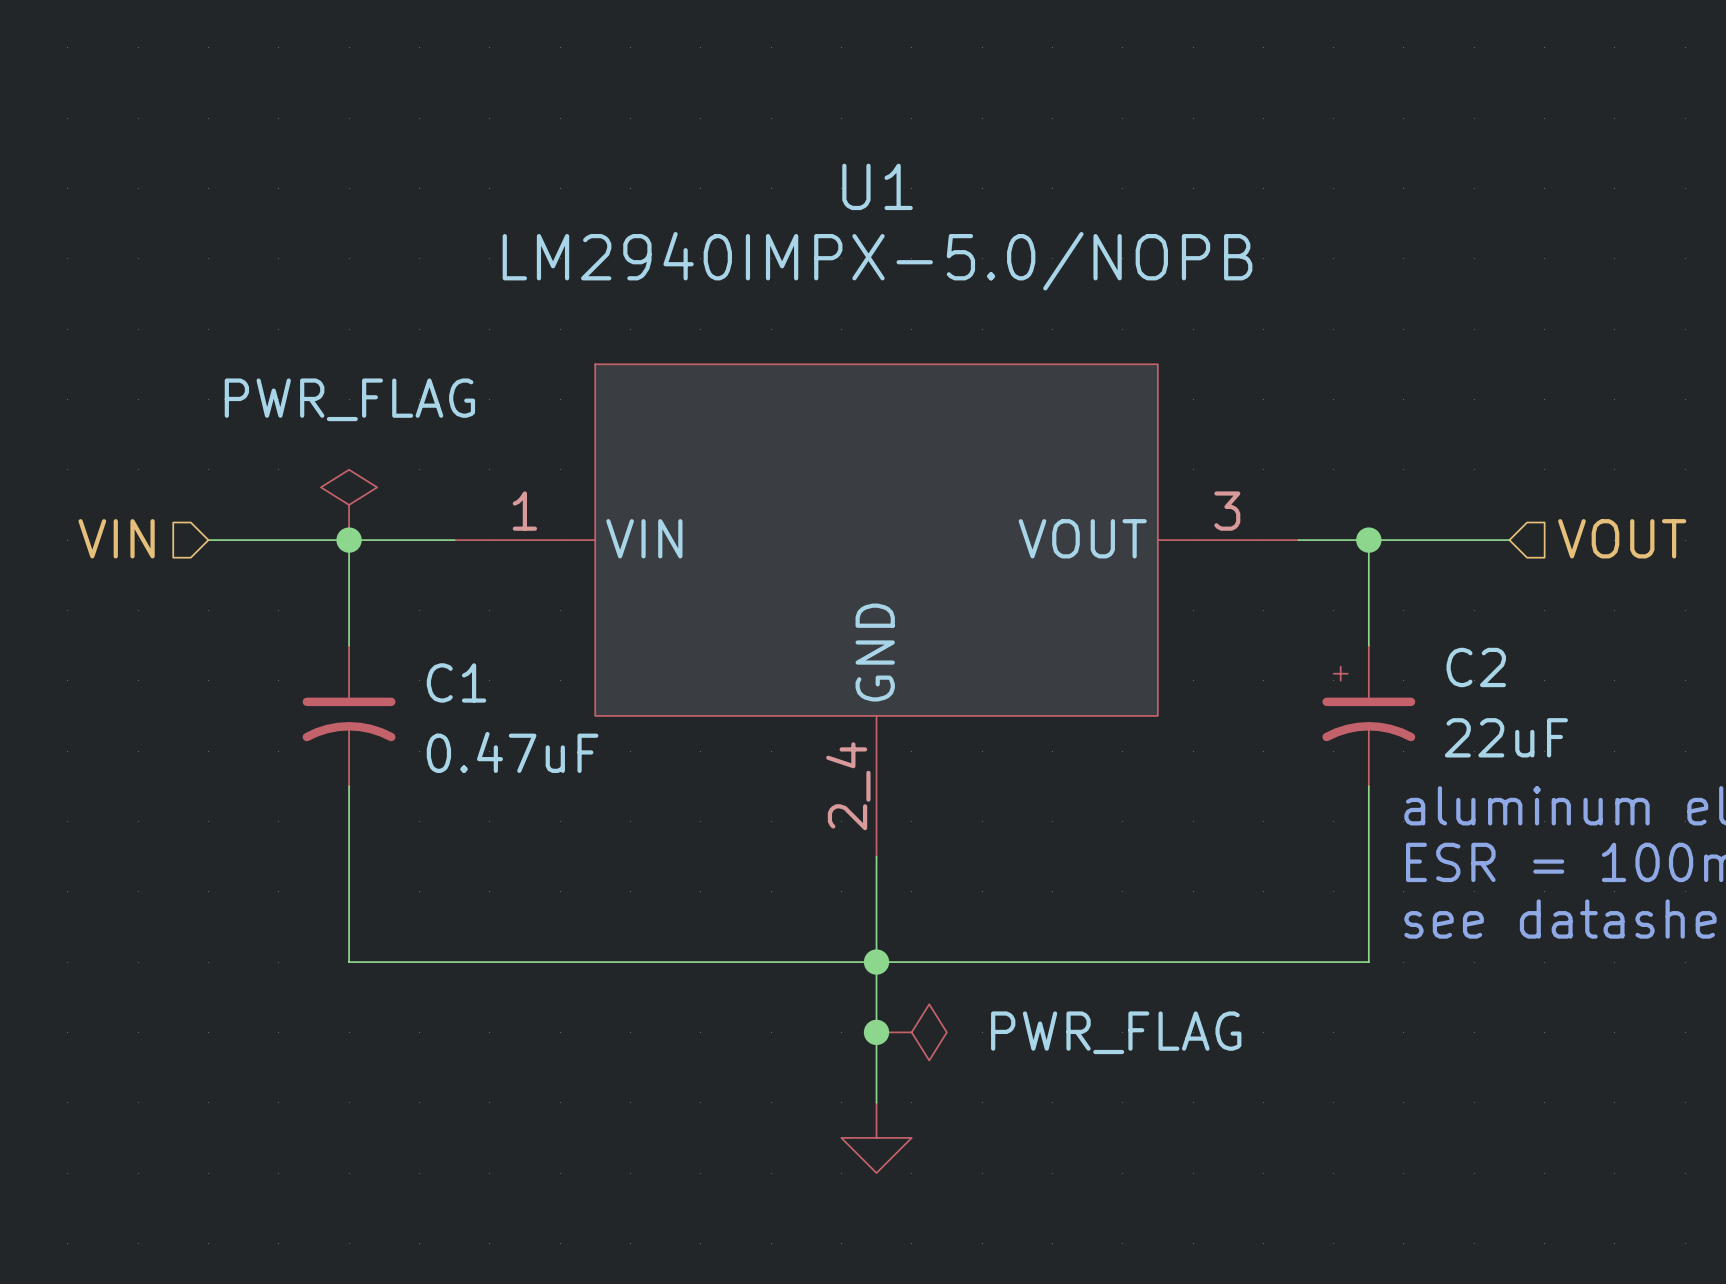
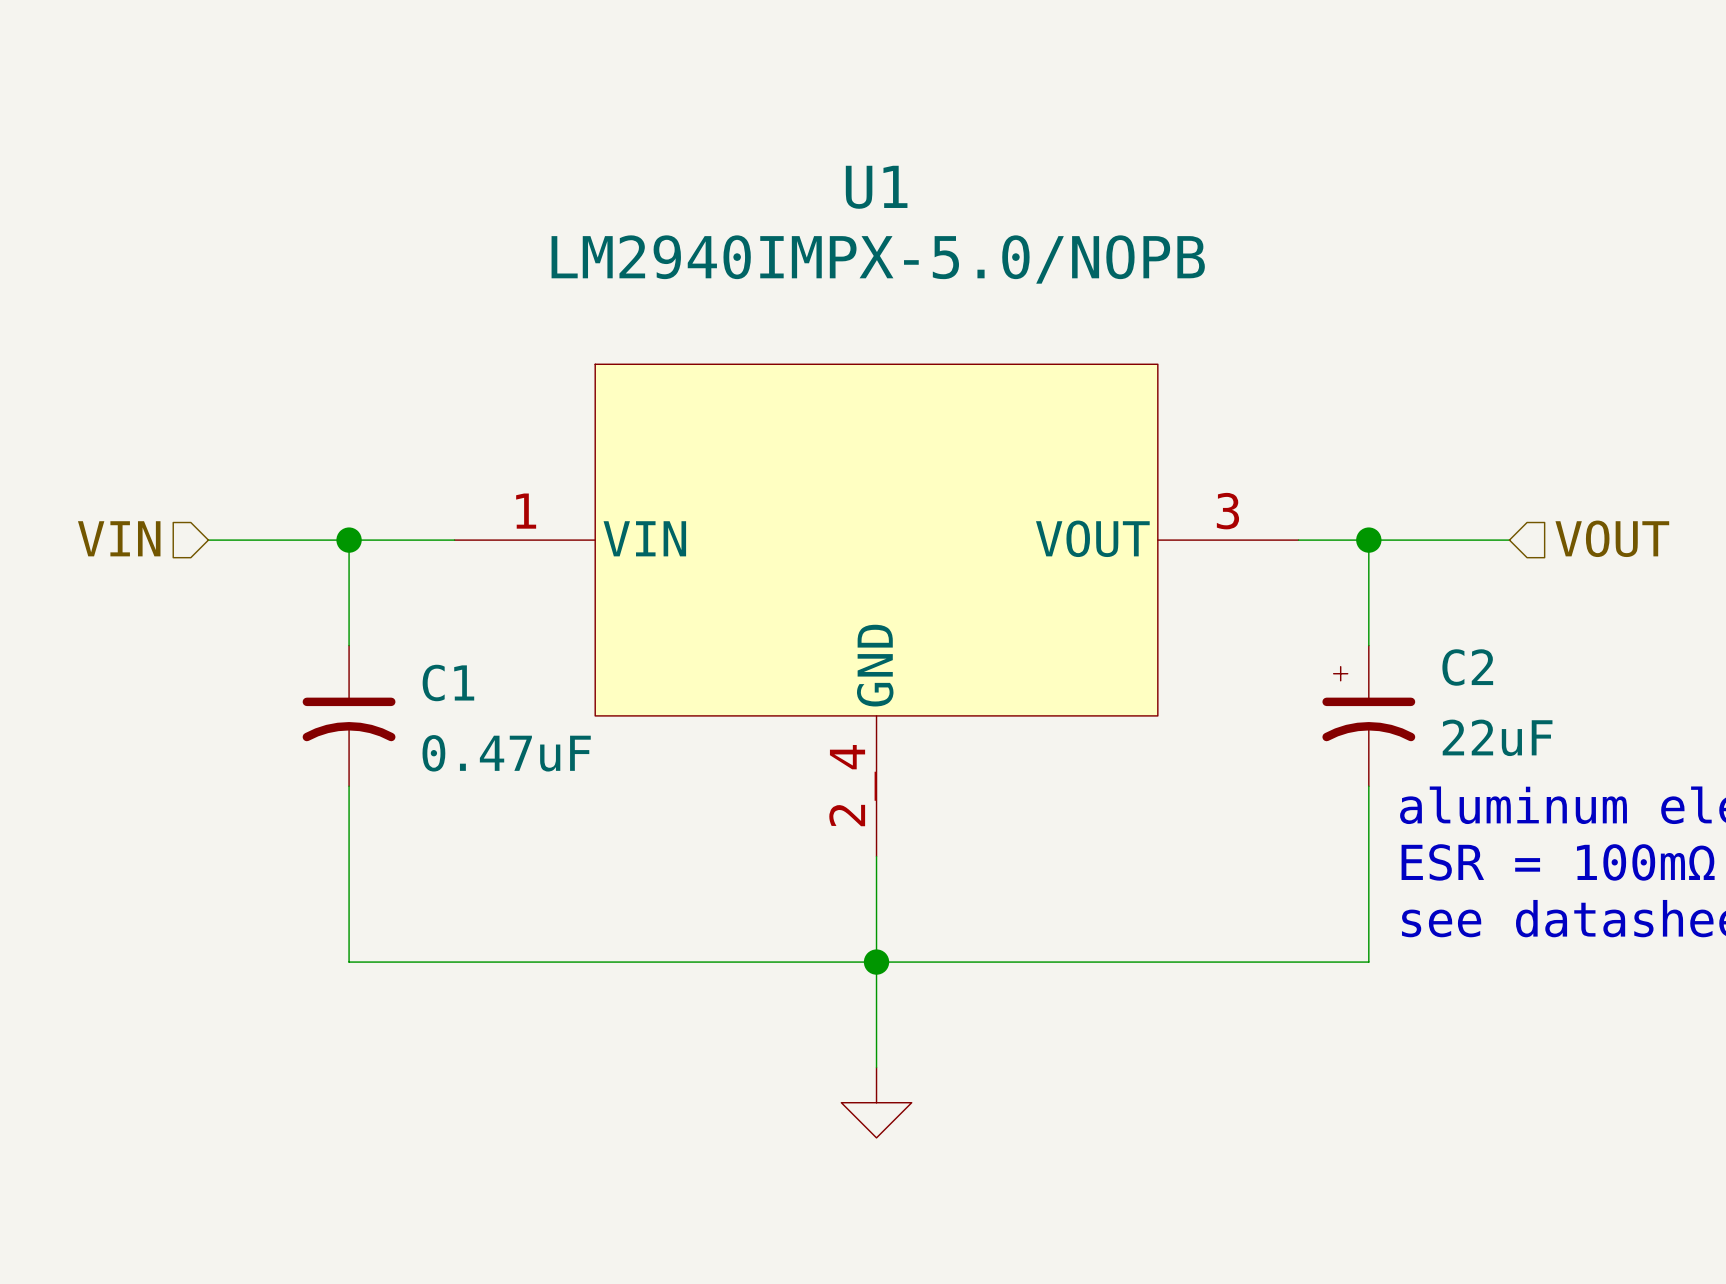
power symbol: PWR_FLAG (349, 504) -> none
junction: (876, 1032) -> none
power symbol: PWR_FLAG (911, 1032) -> none
power symbol position: (876, 1137) -> (876, 1102)

